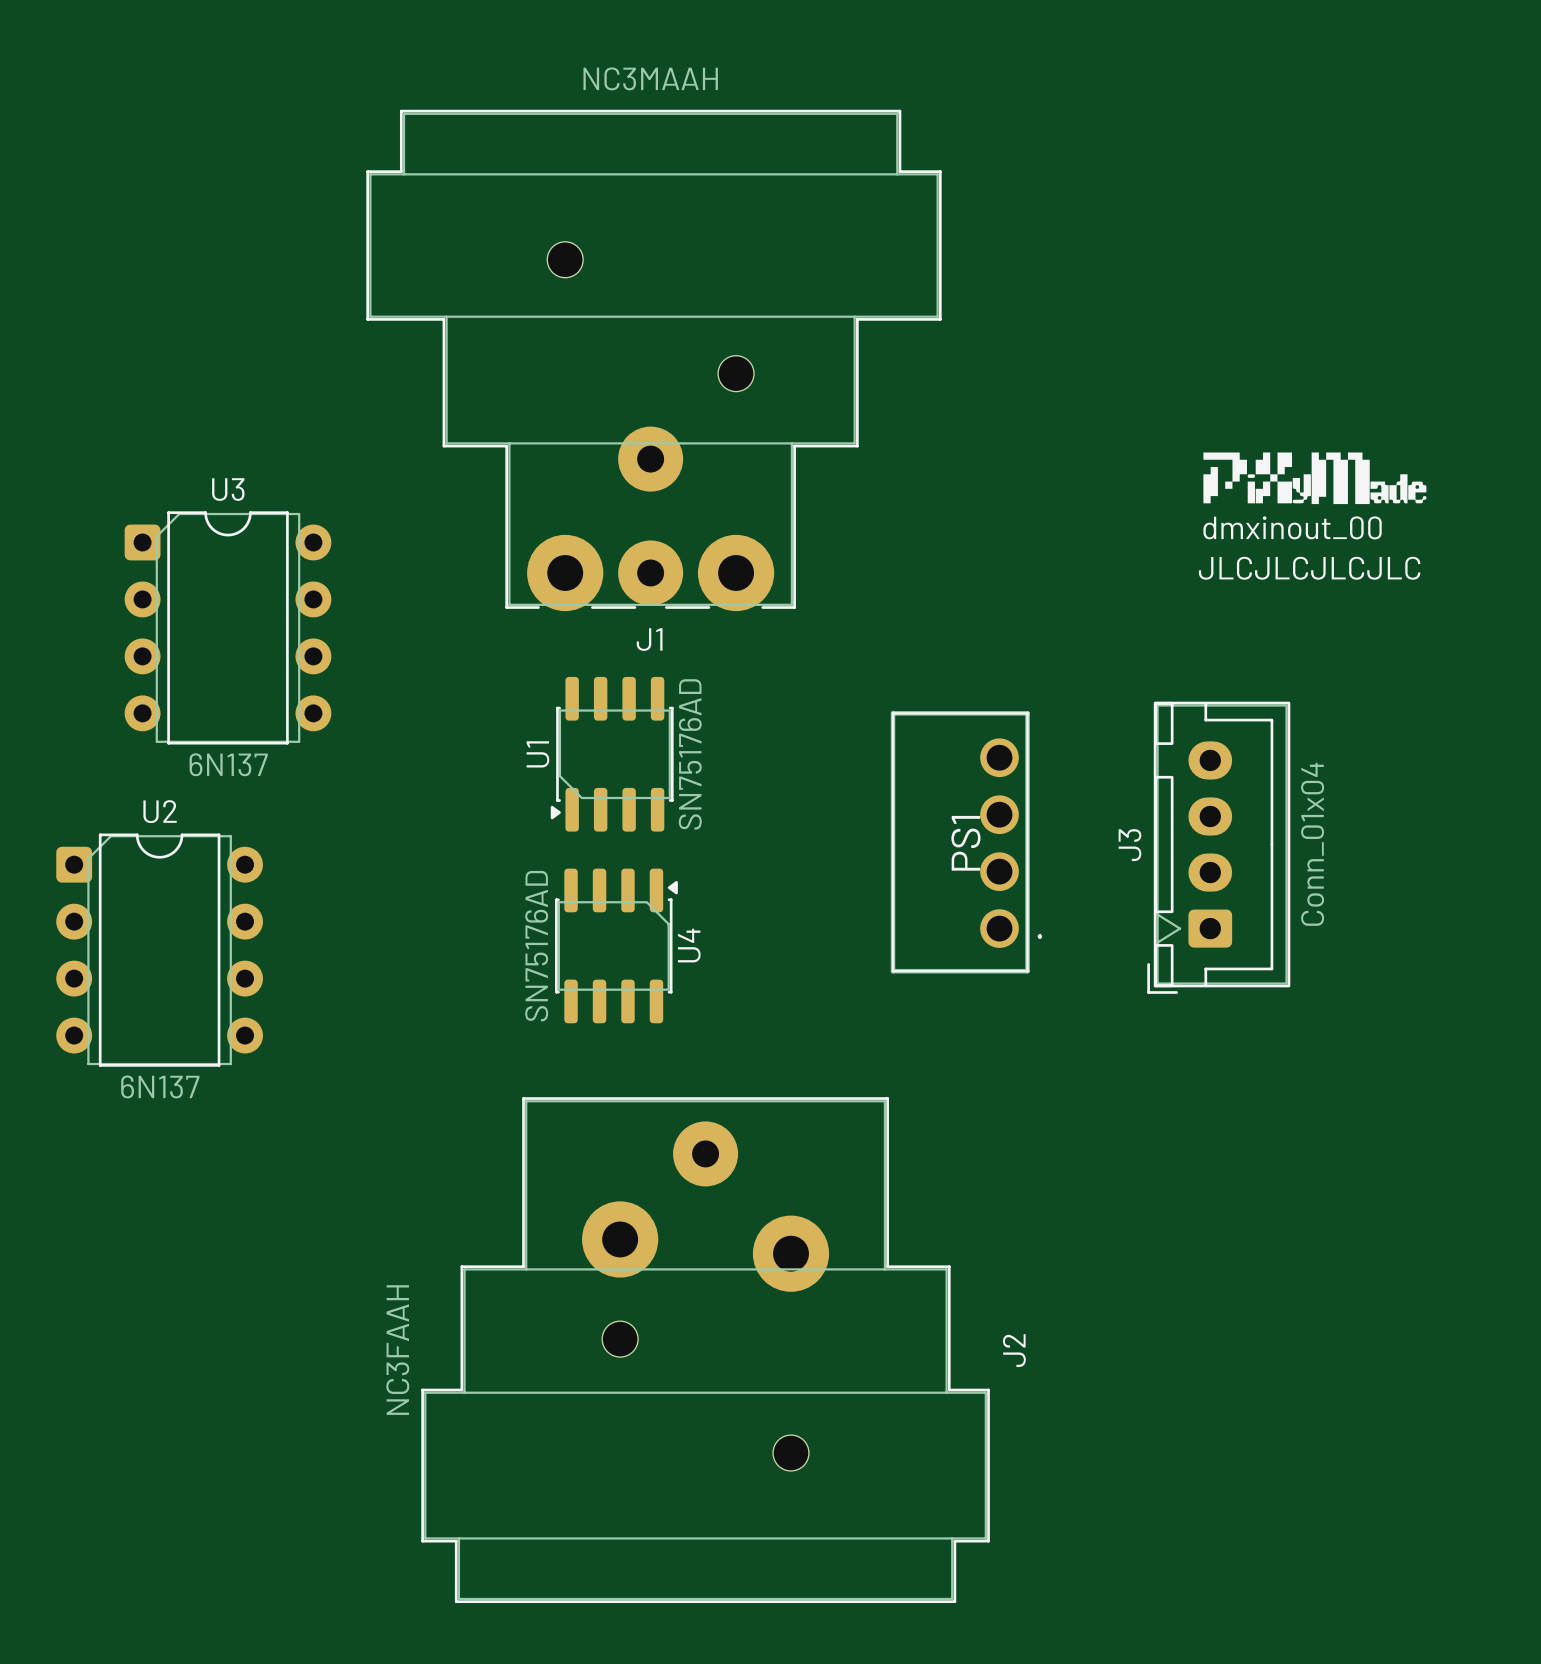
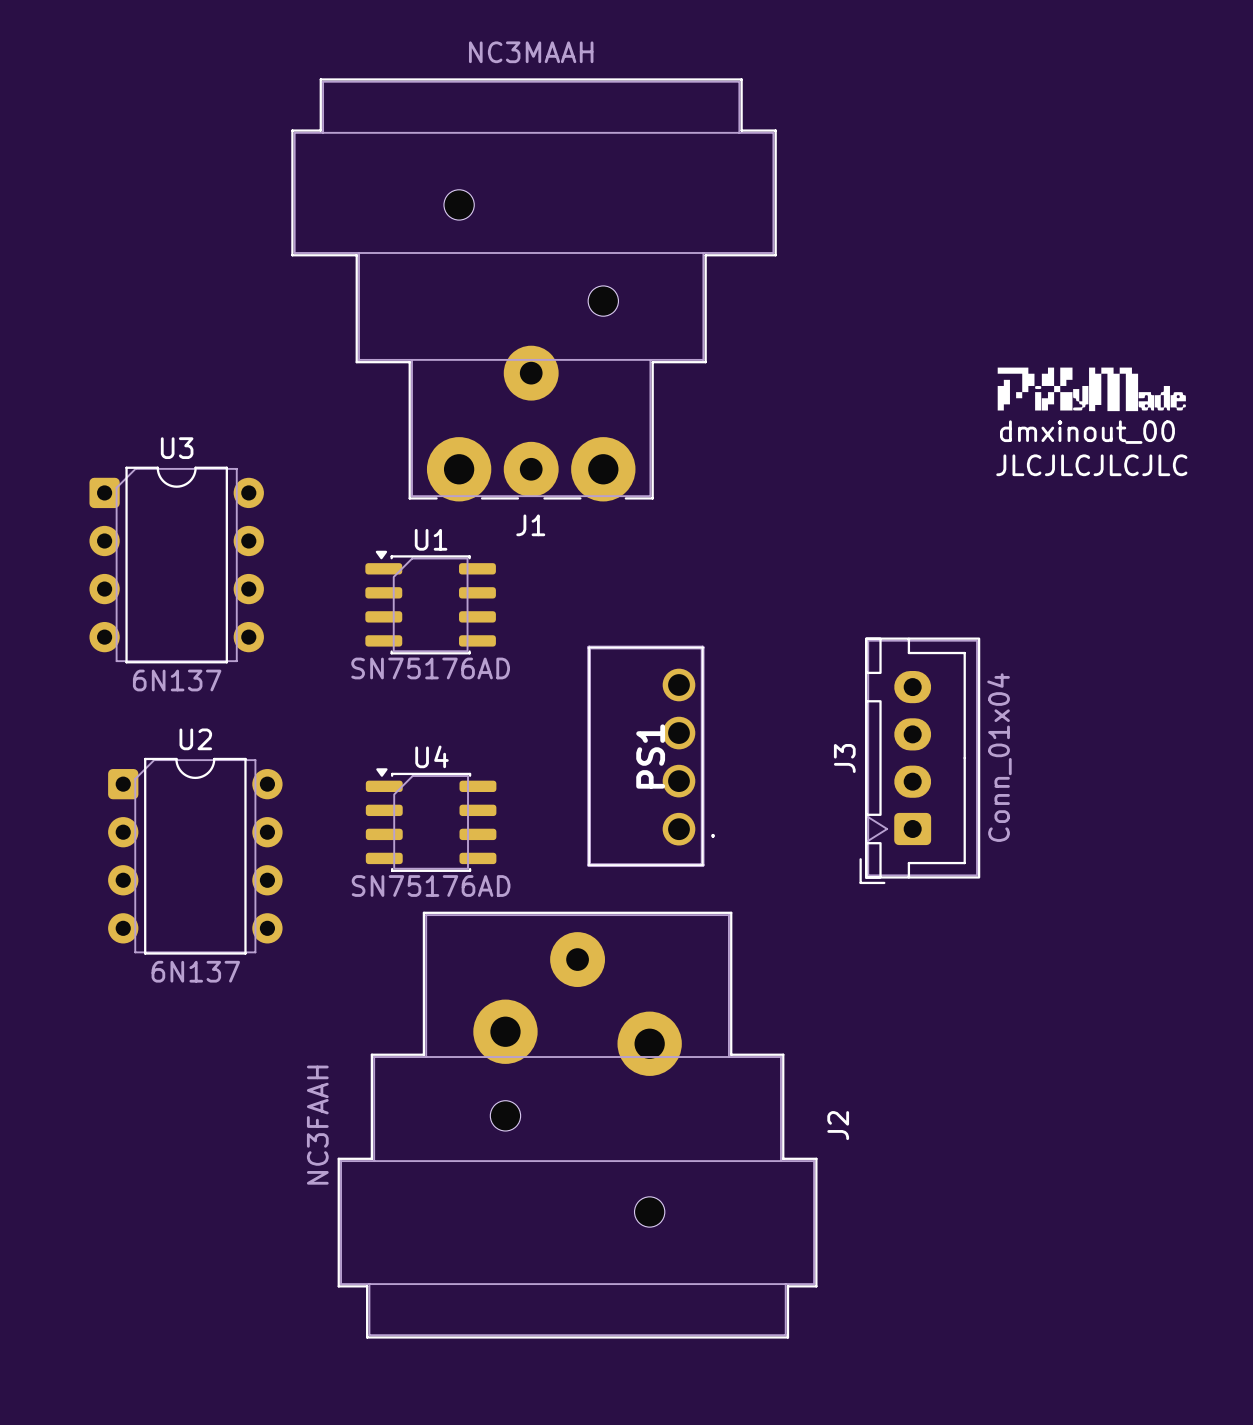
U3 position: (228, 627) -> (176, 565)
U1 rotation: 0° (612, 754) -> 90° clockwise (430, 602)
PS1 position: (966, 842) -> (651, 756)
J3 position: (1218, 847) -> (919, 760)
U4 rotation: 0° (616, 945) -> 90° counterclockwise (431, 820)
U4 position: (616, 945) -> (431, 820)
U2 position: (159, 950) -> (195, 856)

